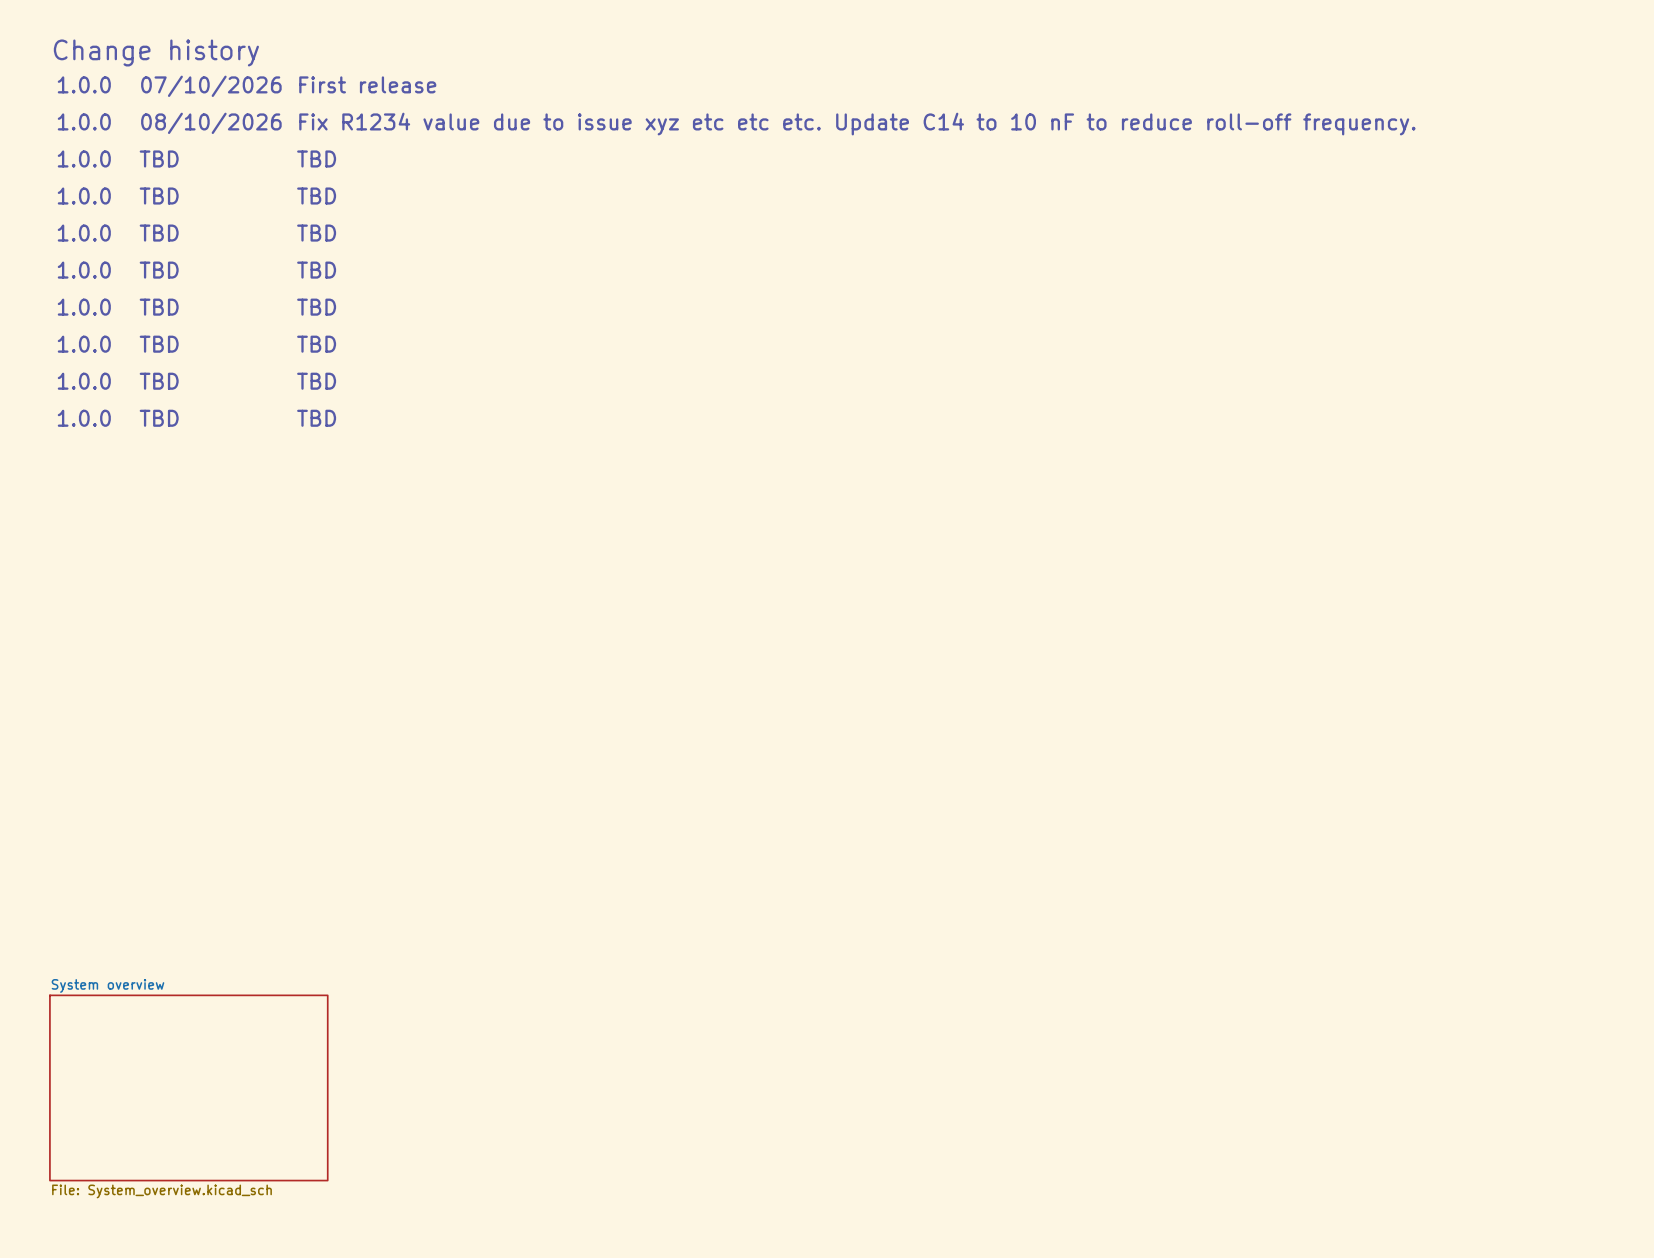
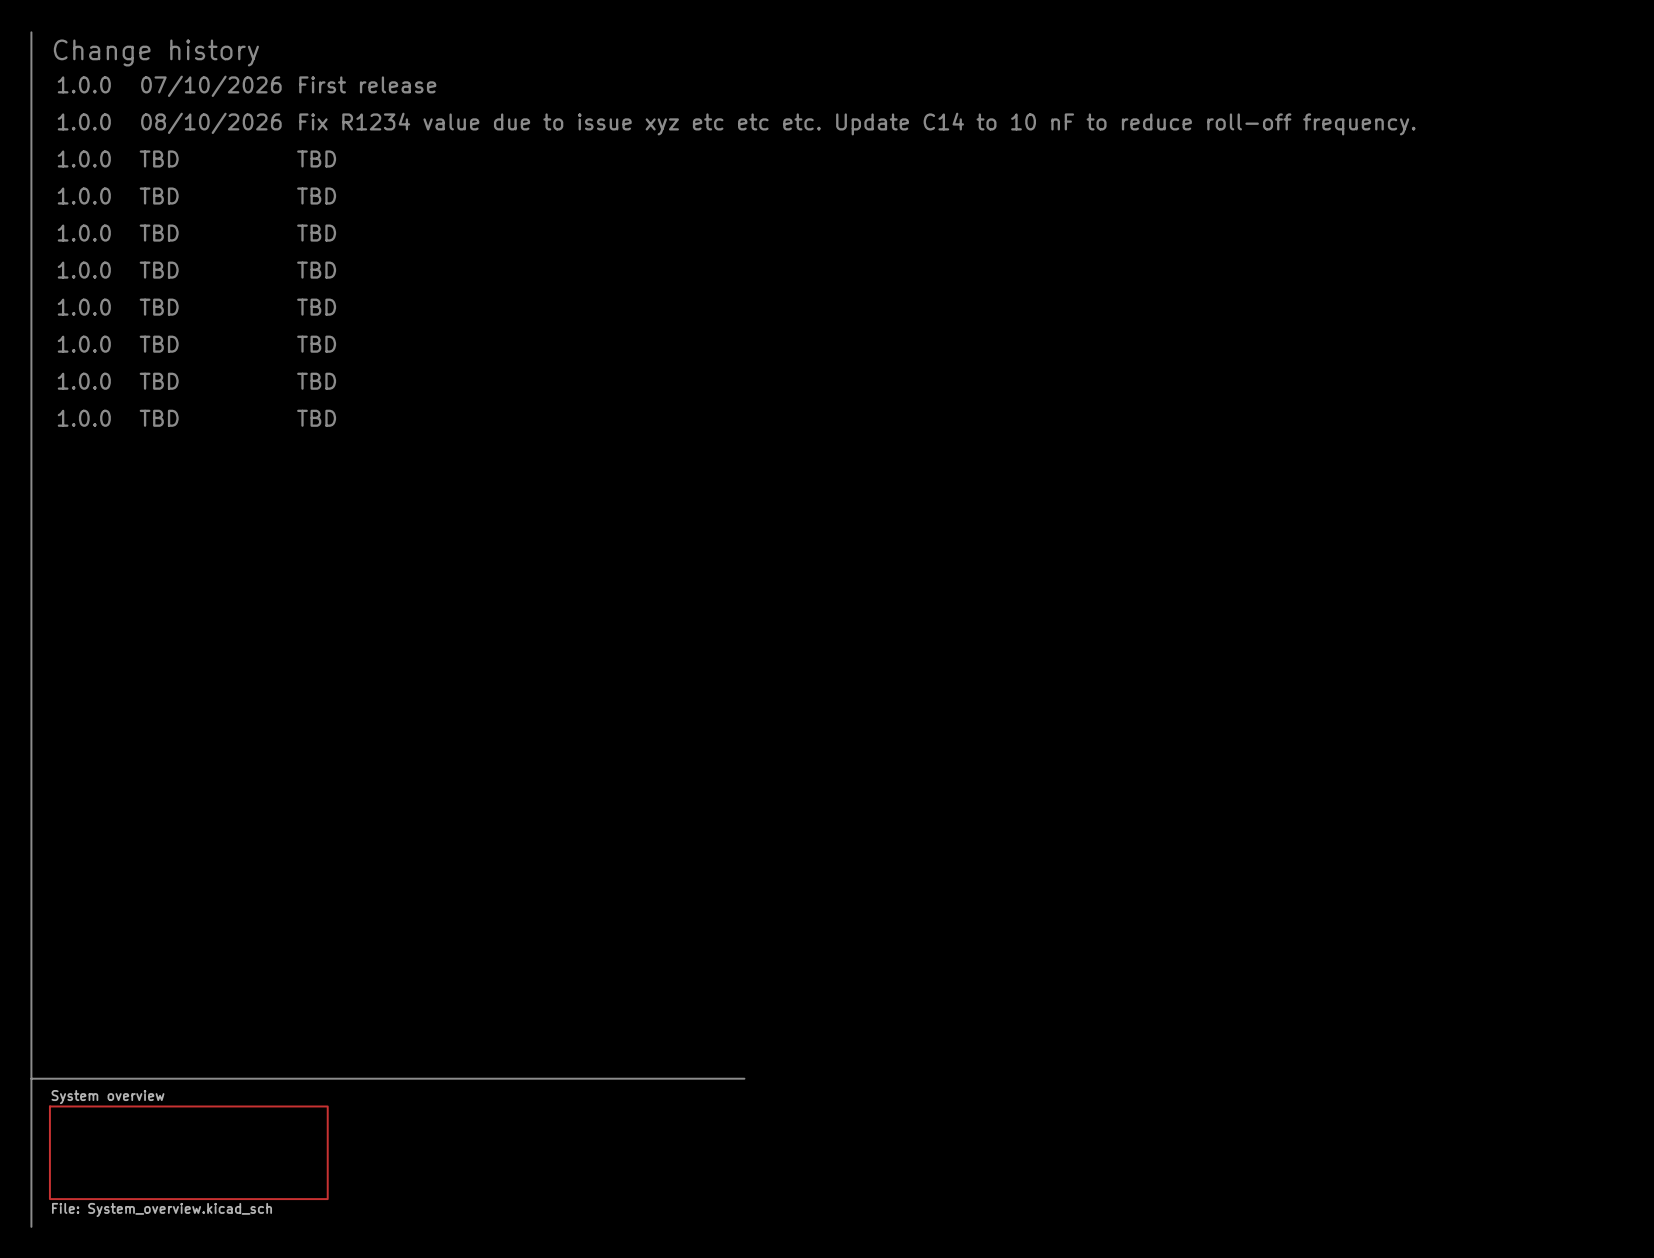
line: none -> (31, 32) (31, 1226)
line: none -> (31, 1078) (744, 1078)
sheet System overview: File: System_overview.kicad_sch (188, 1087) -> none
sheet System overview: none -> File: System_overview.kicad_sch (188, 1152)

